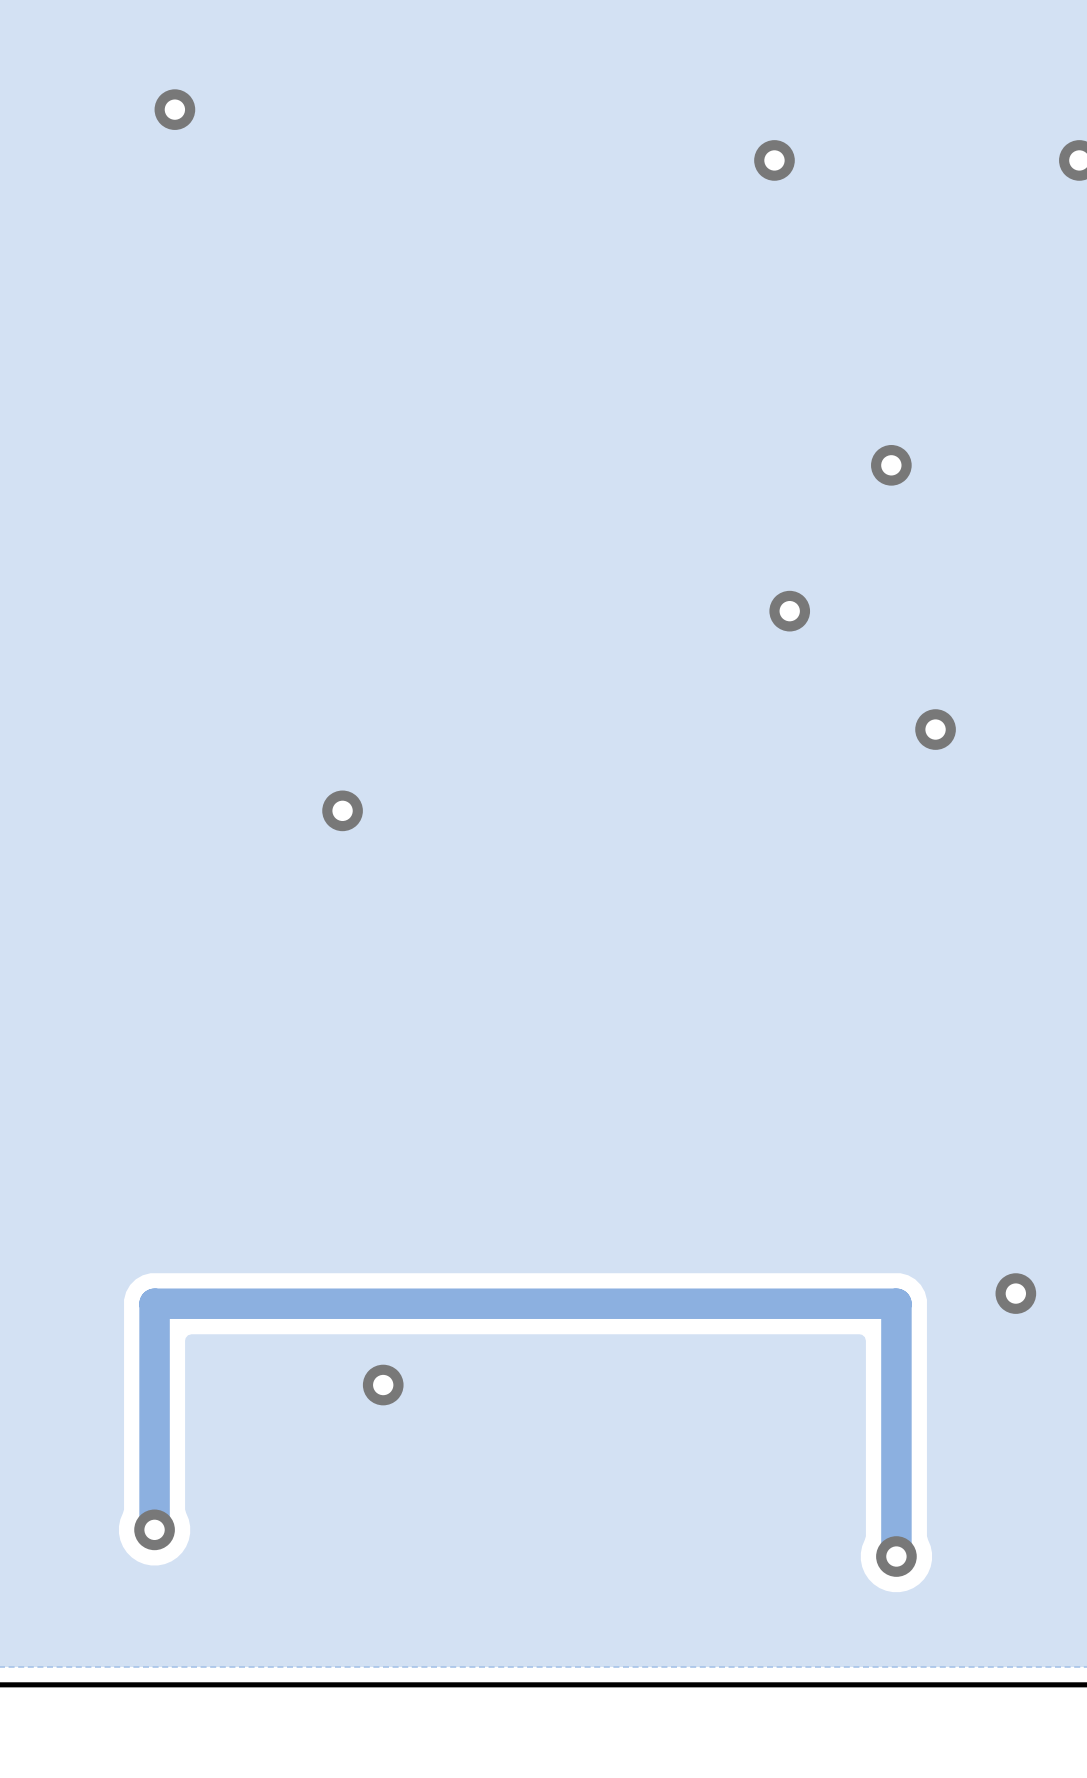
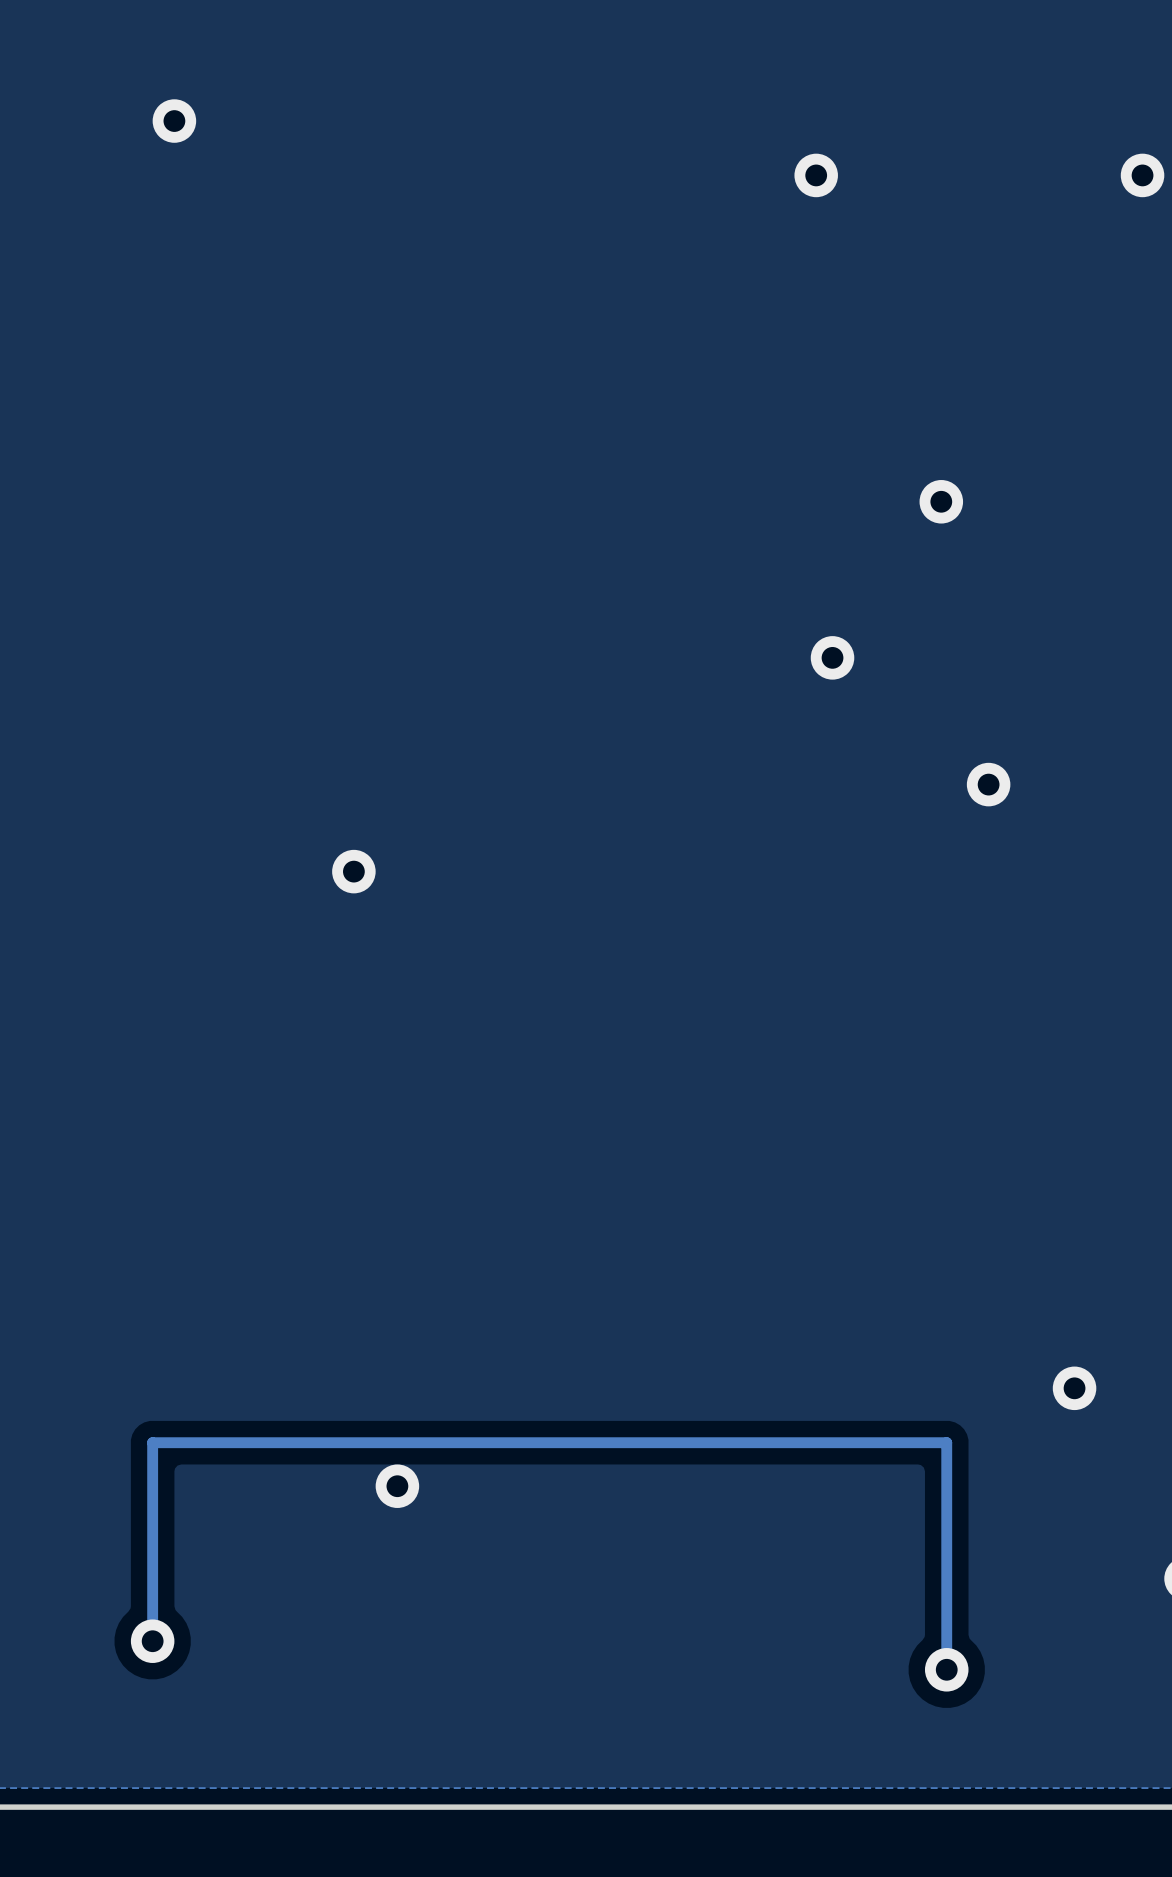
track width: thick (154, 1344) (154, 1529) -> thin (152, 1442) (152, 1641)
track: (896, 1344) (896, 1303) (154, 1303) (154, 1344) -> (946, 1442) (152, 1442)
track width: thick (896, 1344) (896, 1556) -> thin (946, 1442) (946, 1669)

